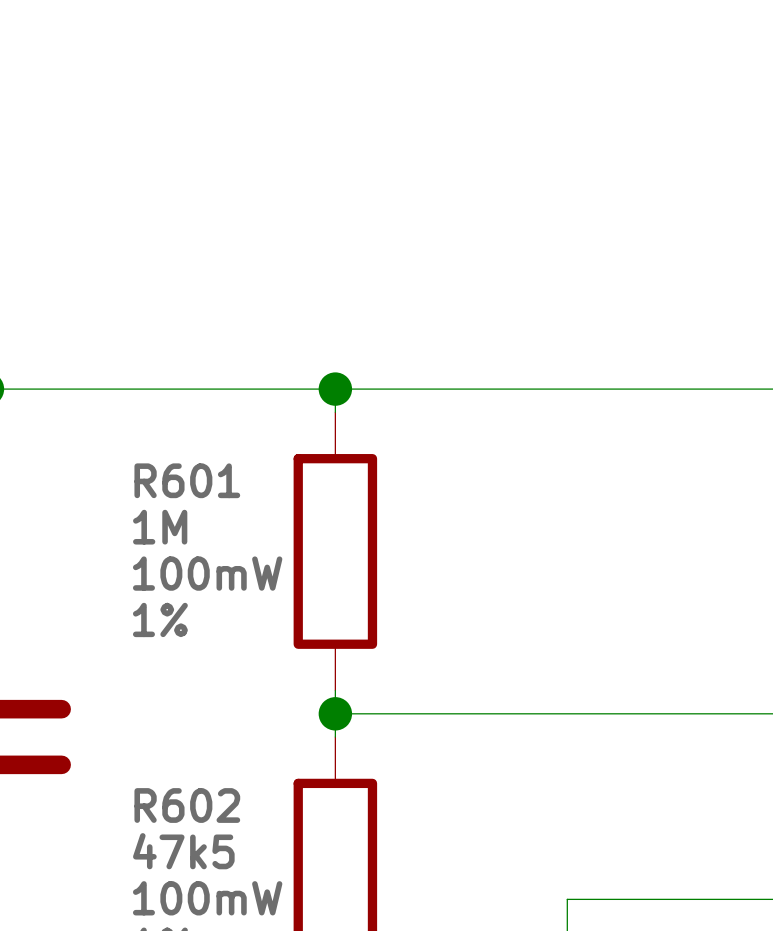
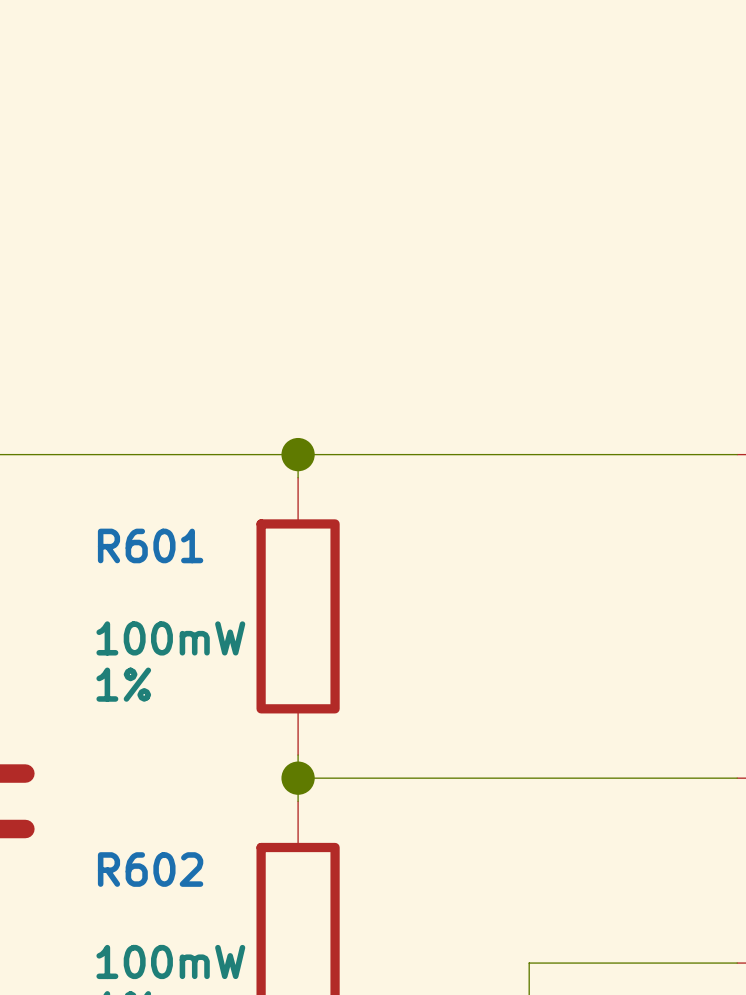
R601 value: 1M (160, 527) -> none
R602 value: 47k5 (183, 851) -> none

